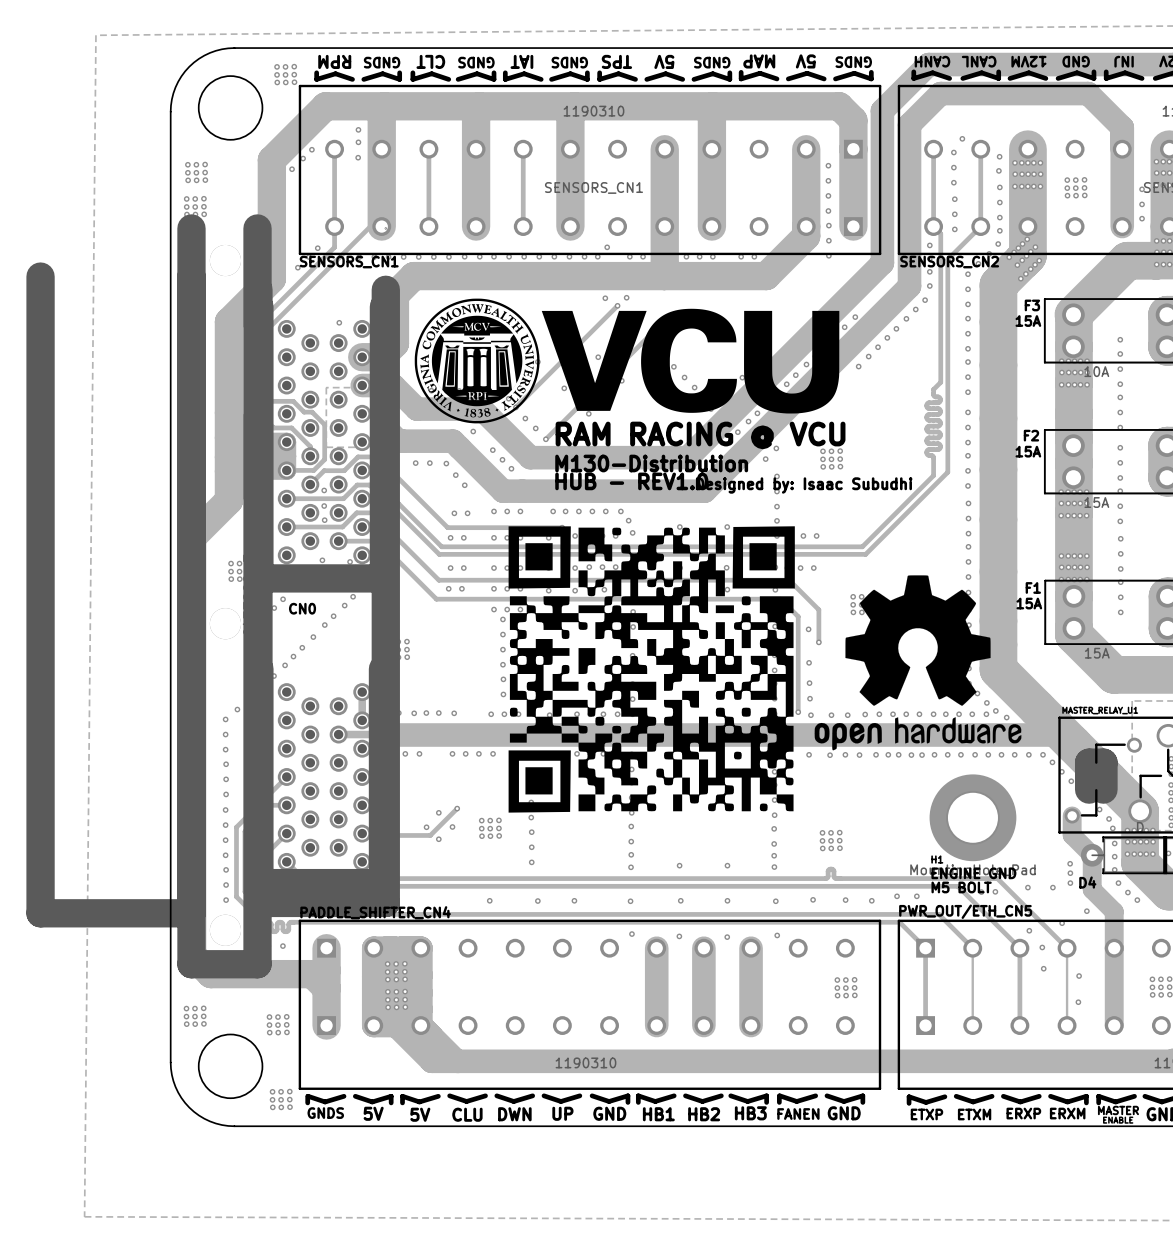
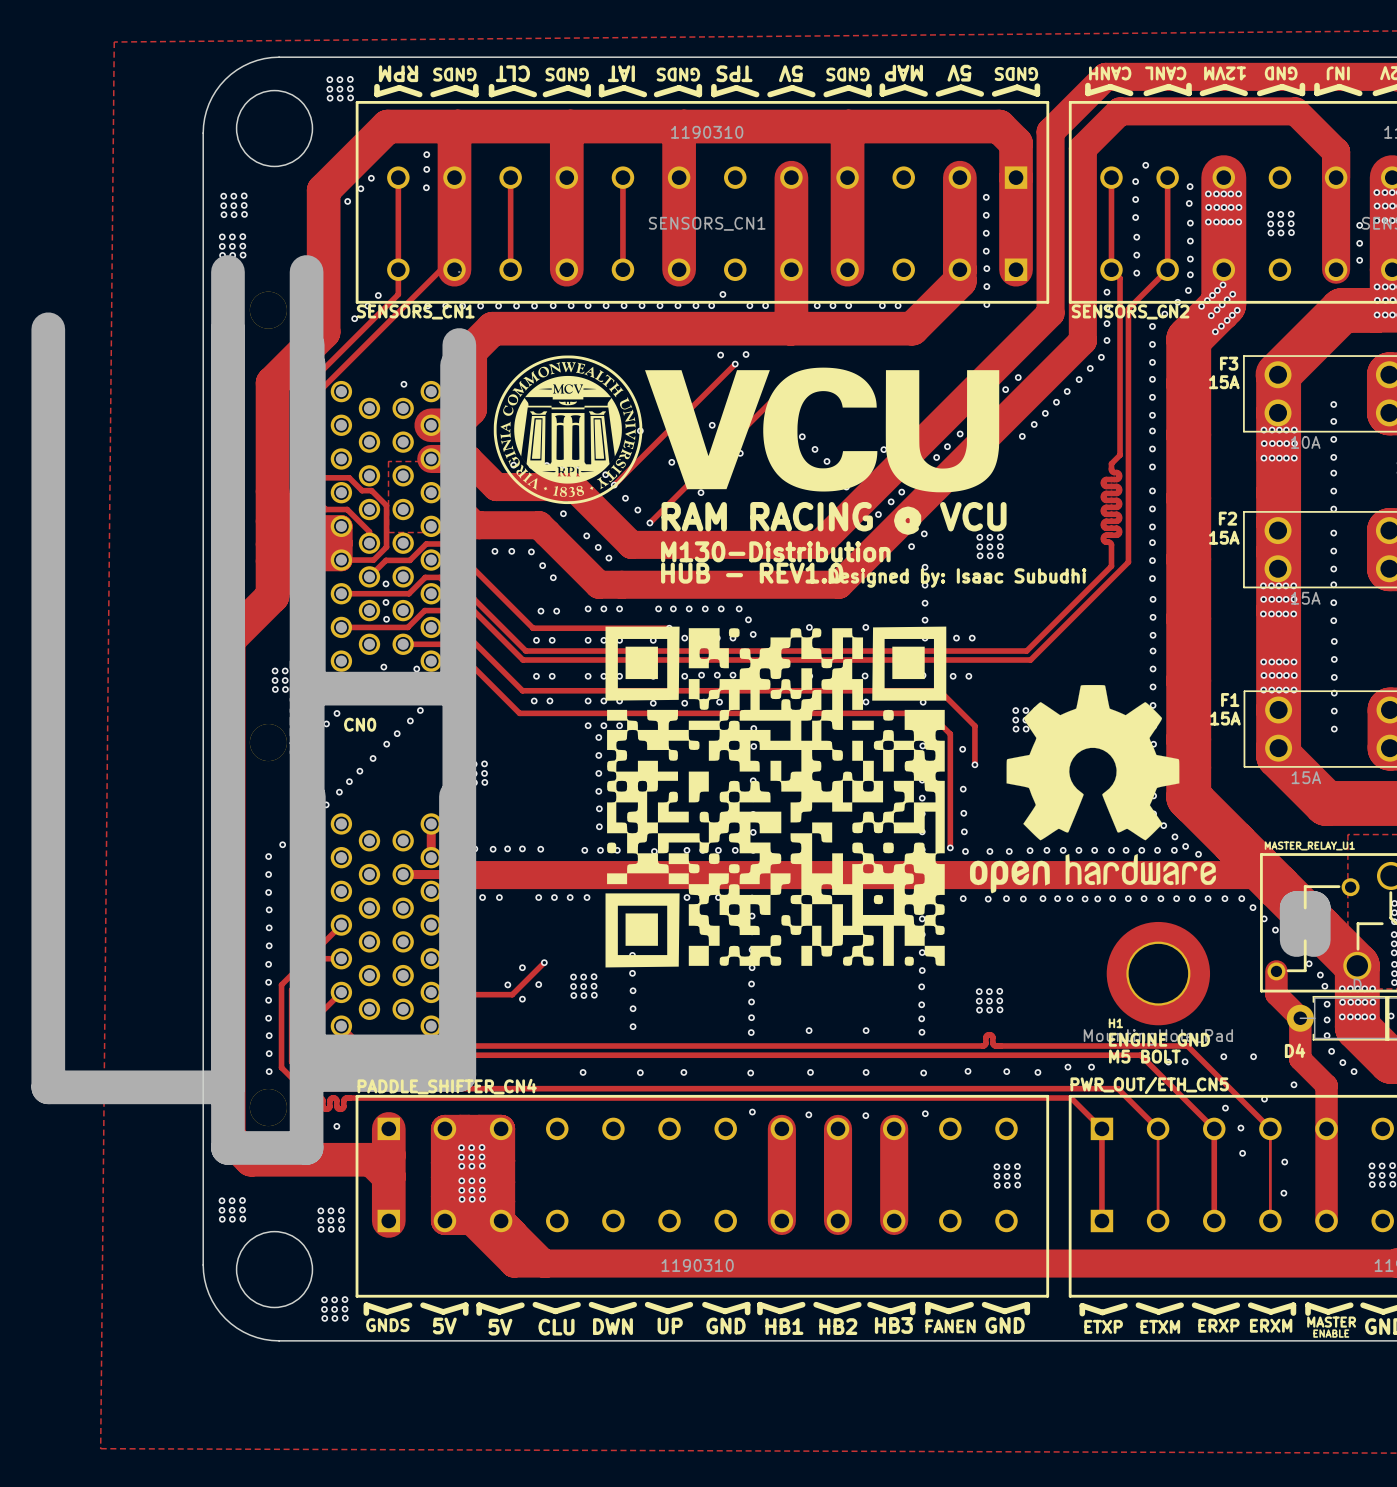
via: (1070, 863) -> none
via: (1070, 873) -> none
via: (1070, 883) -> none

